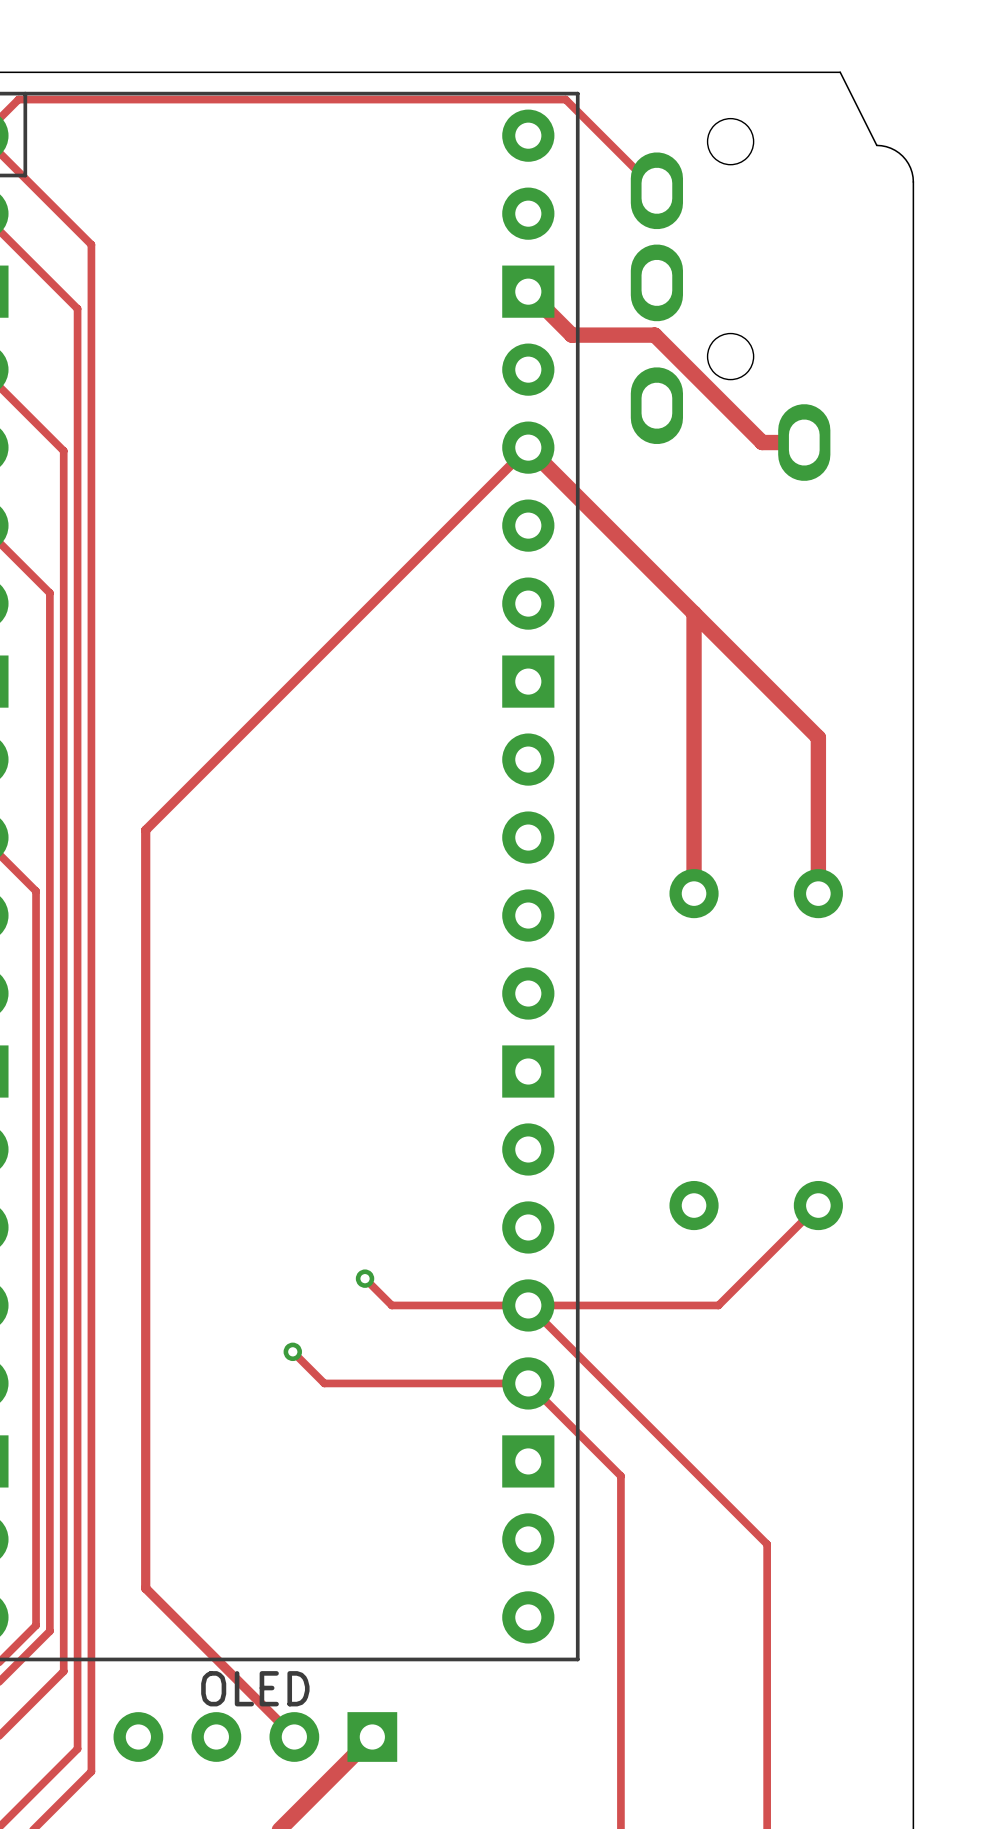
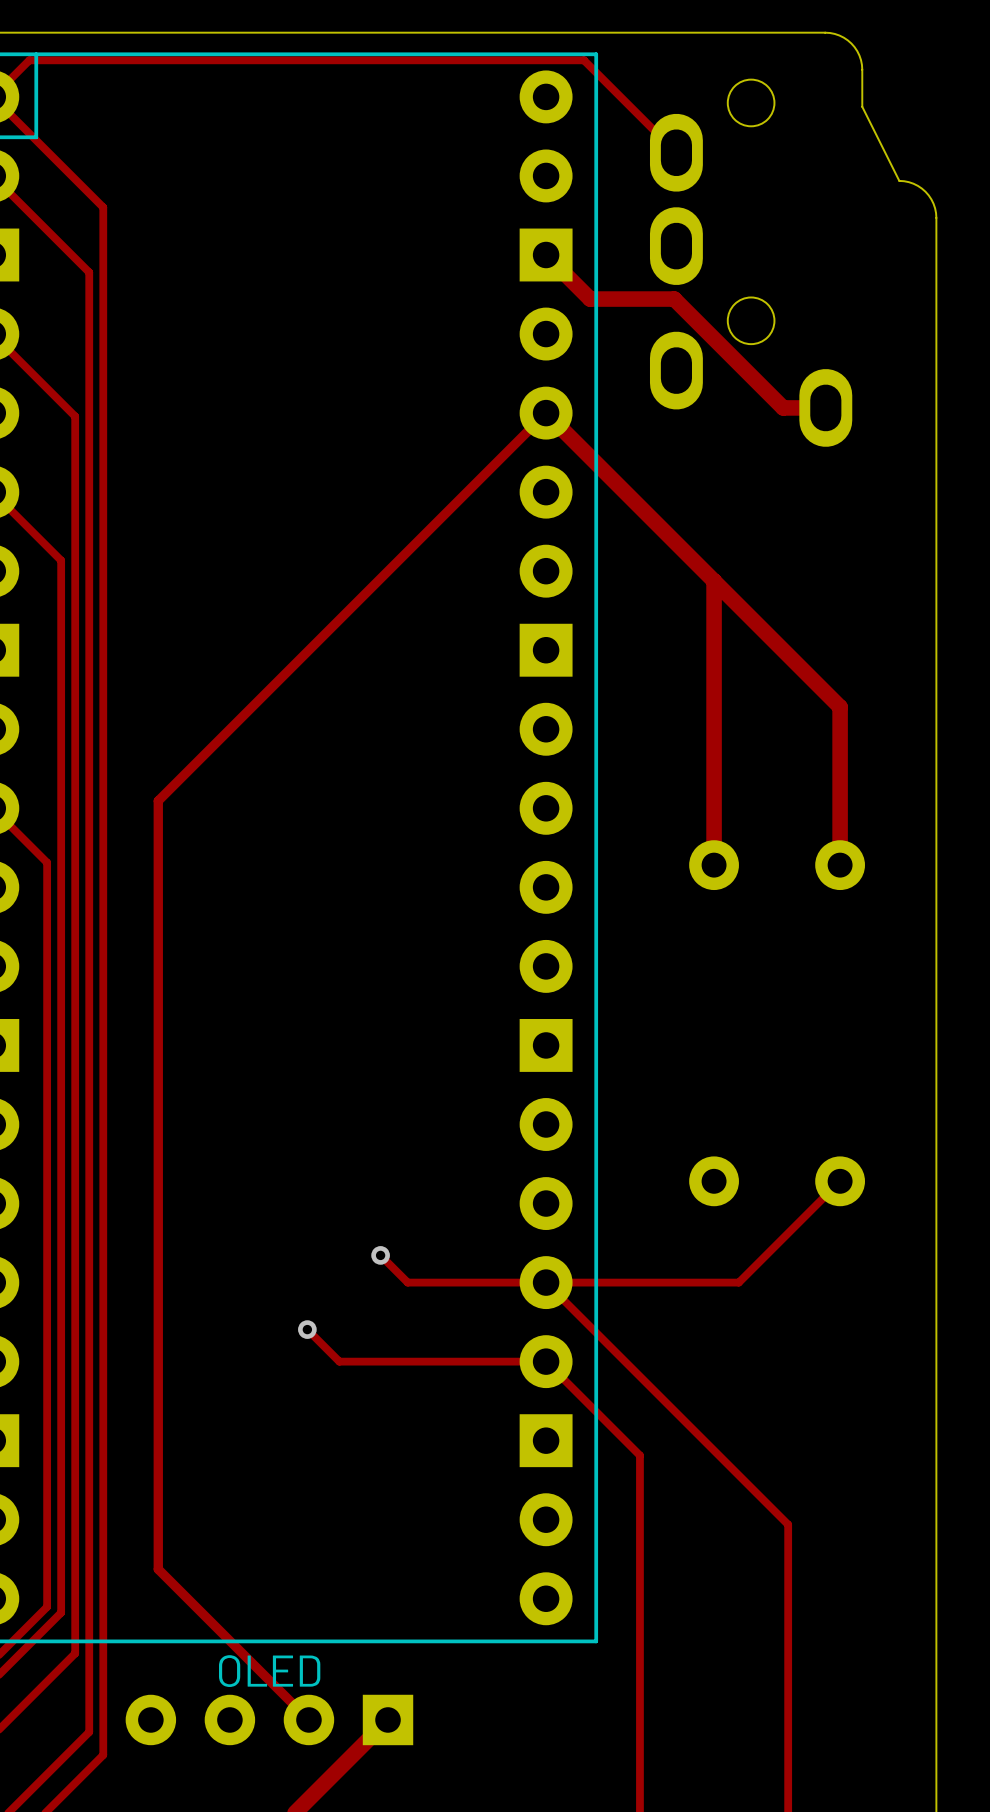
board edge: (803, 72) (840, 72) (876, 145) (895, 150) (908, 163) (913, 181) (913, 255) -> (825, 32) (843, 37) (857, 51) (861, 64) (862, 106) (899, 180) (913, 183) (925, 191) (933, 203) (936, 217)

